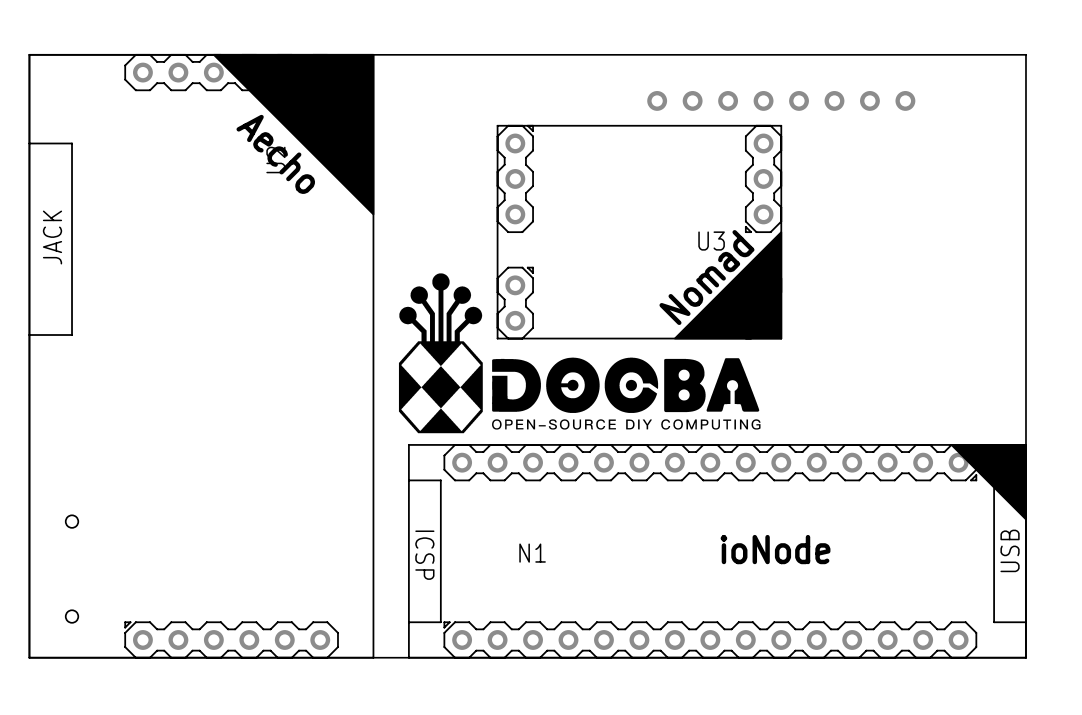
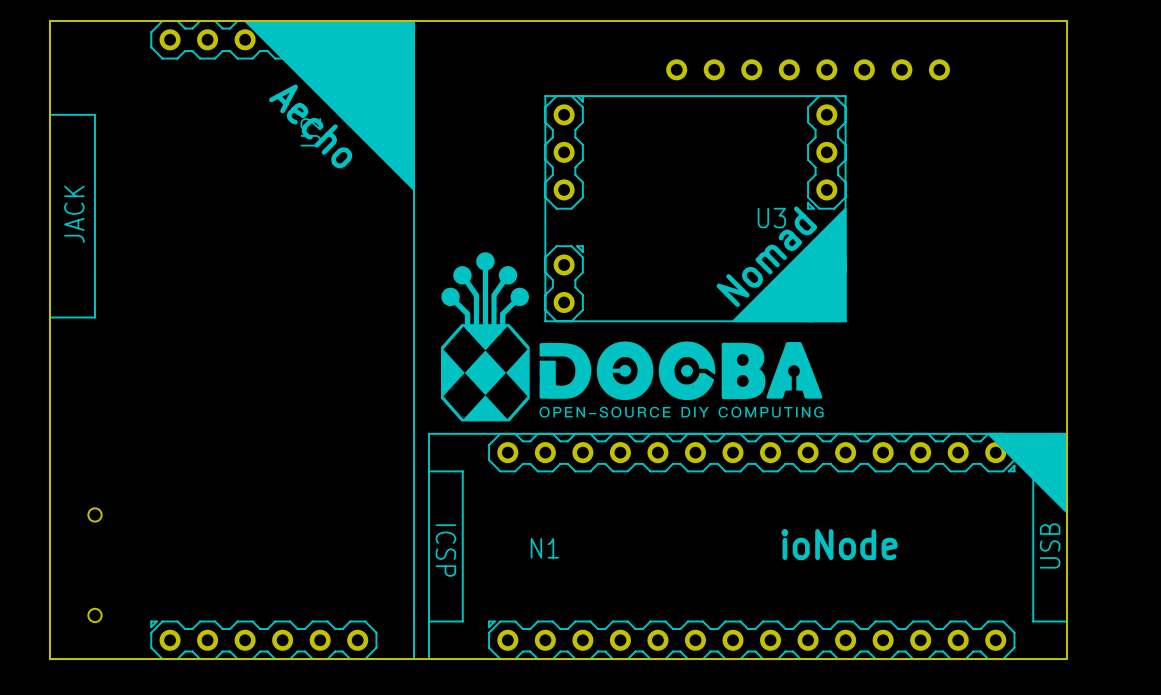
board edge: (990, 54) (1025, 54) (1025, 657) (990, 657) -> (1067, 21) (1067, 659)
part position: (781, 100) -> (808, 69)
N1 footprint: [408, 444, 1027, 659] -> [428, 432, 1068, 660]

